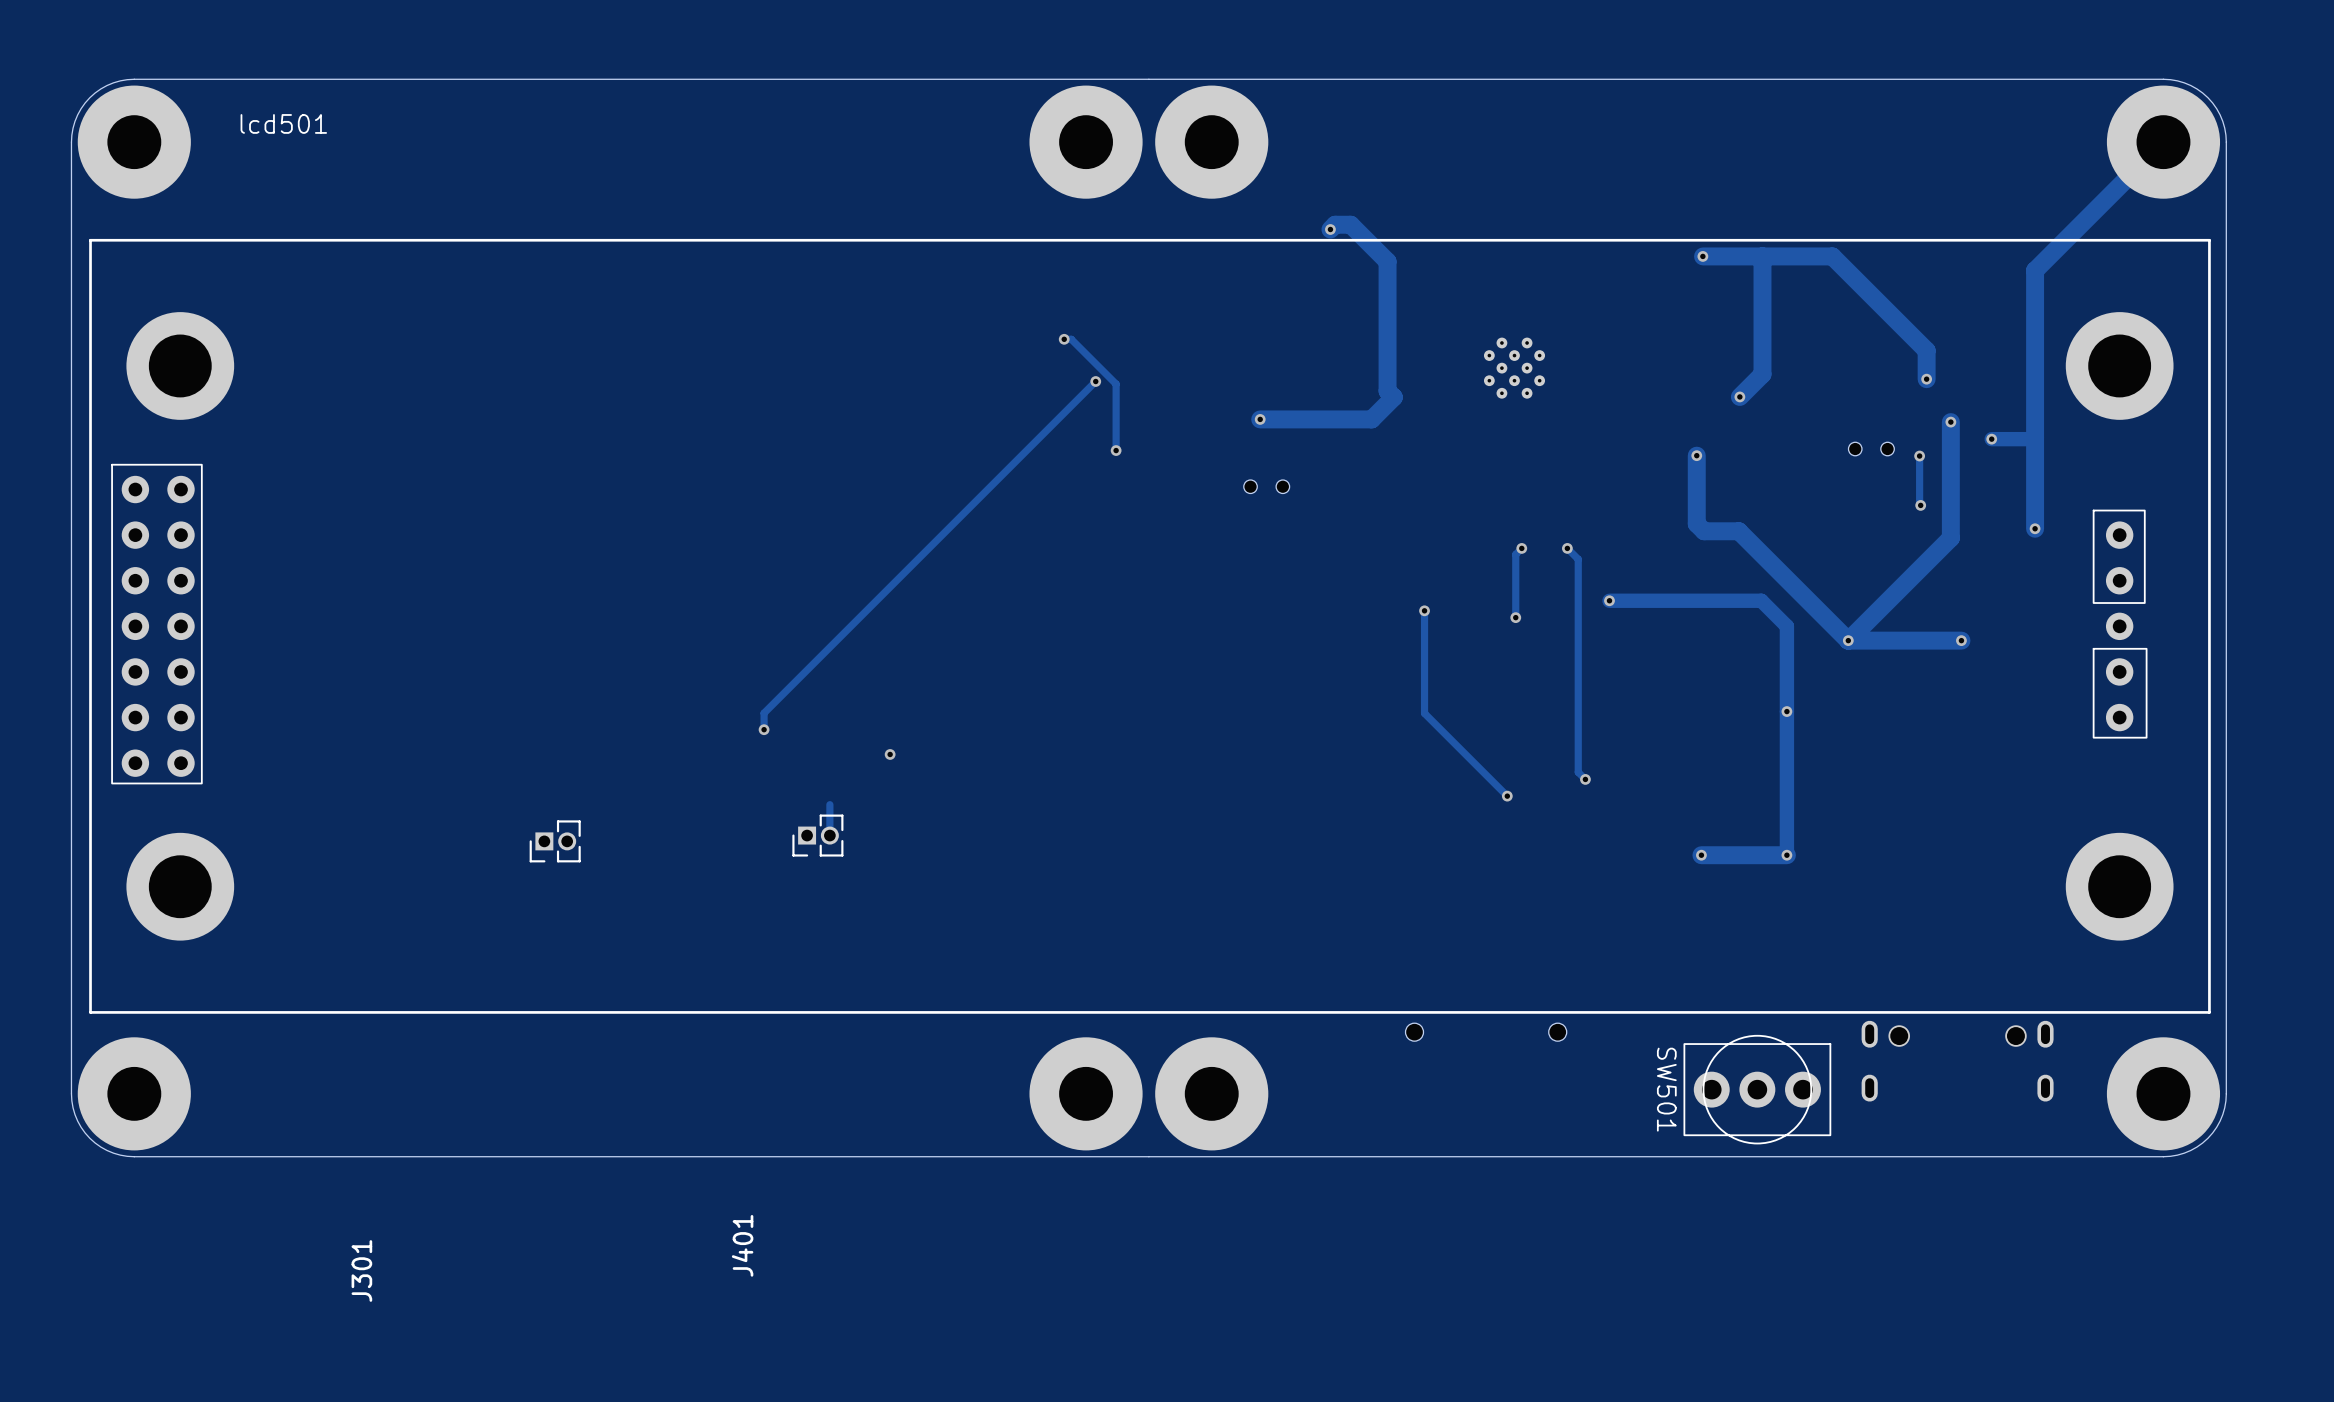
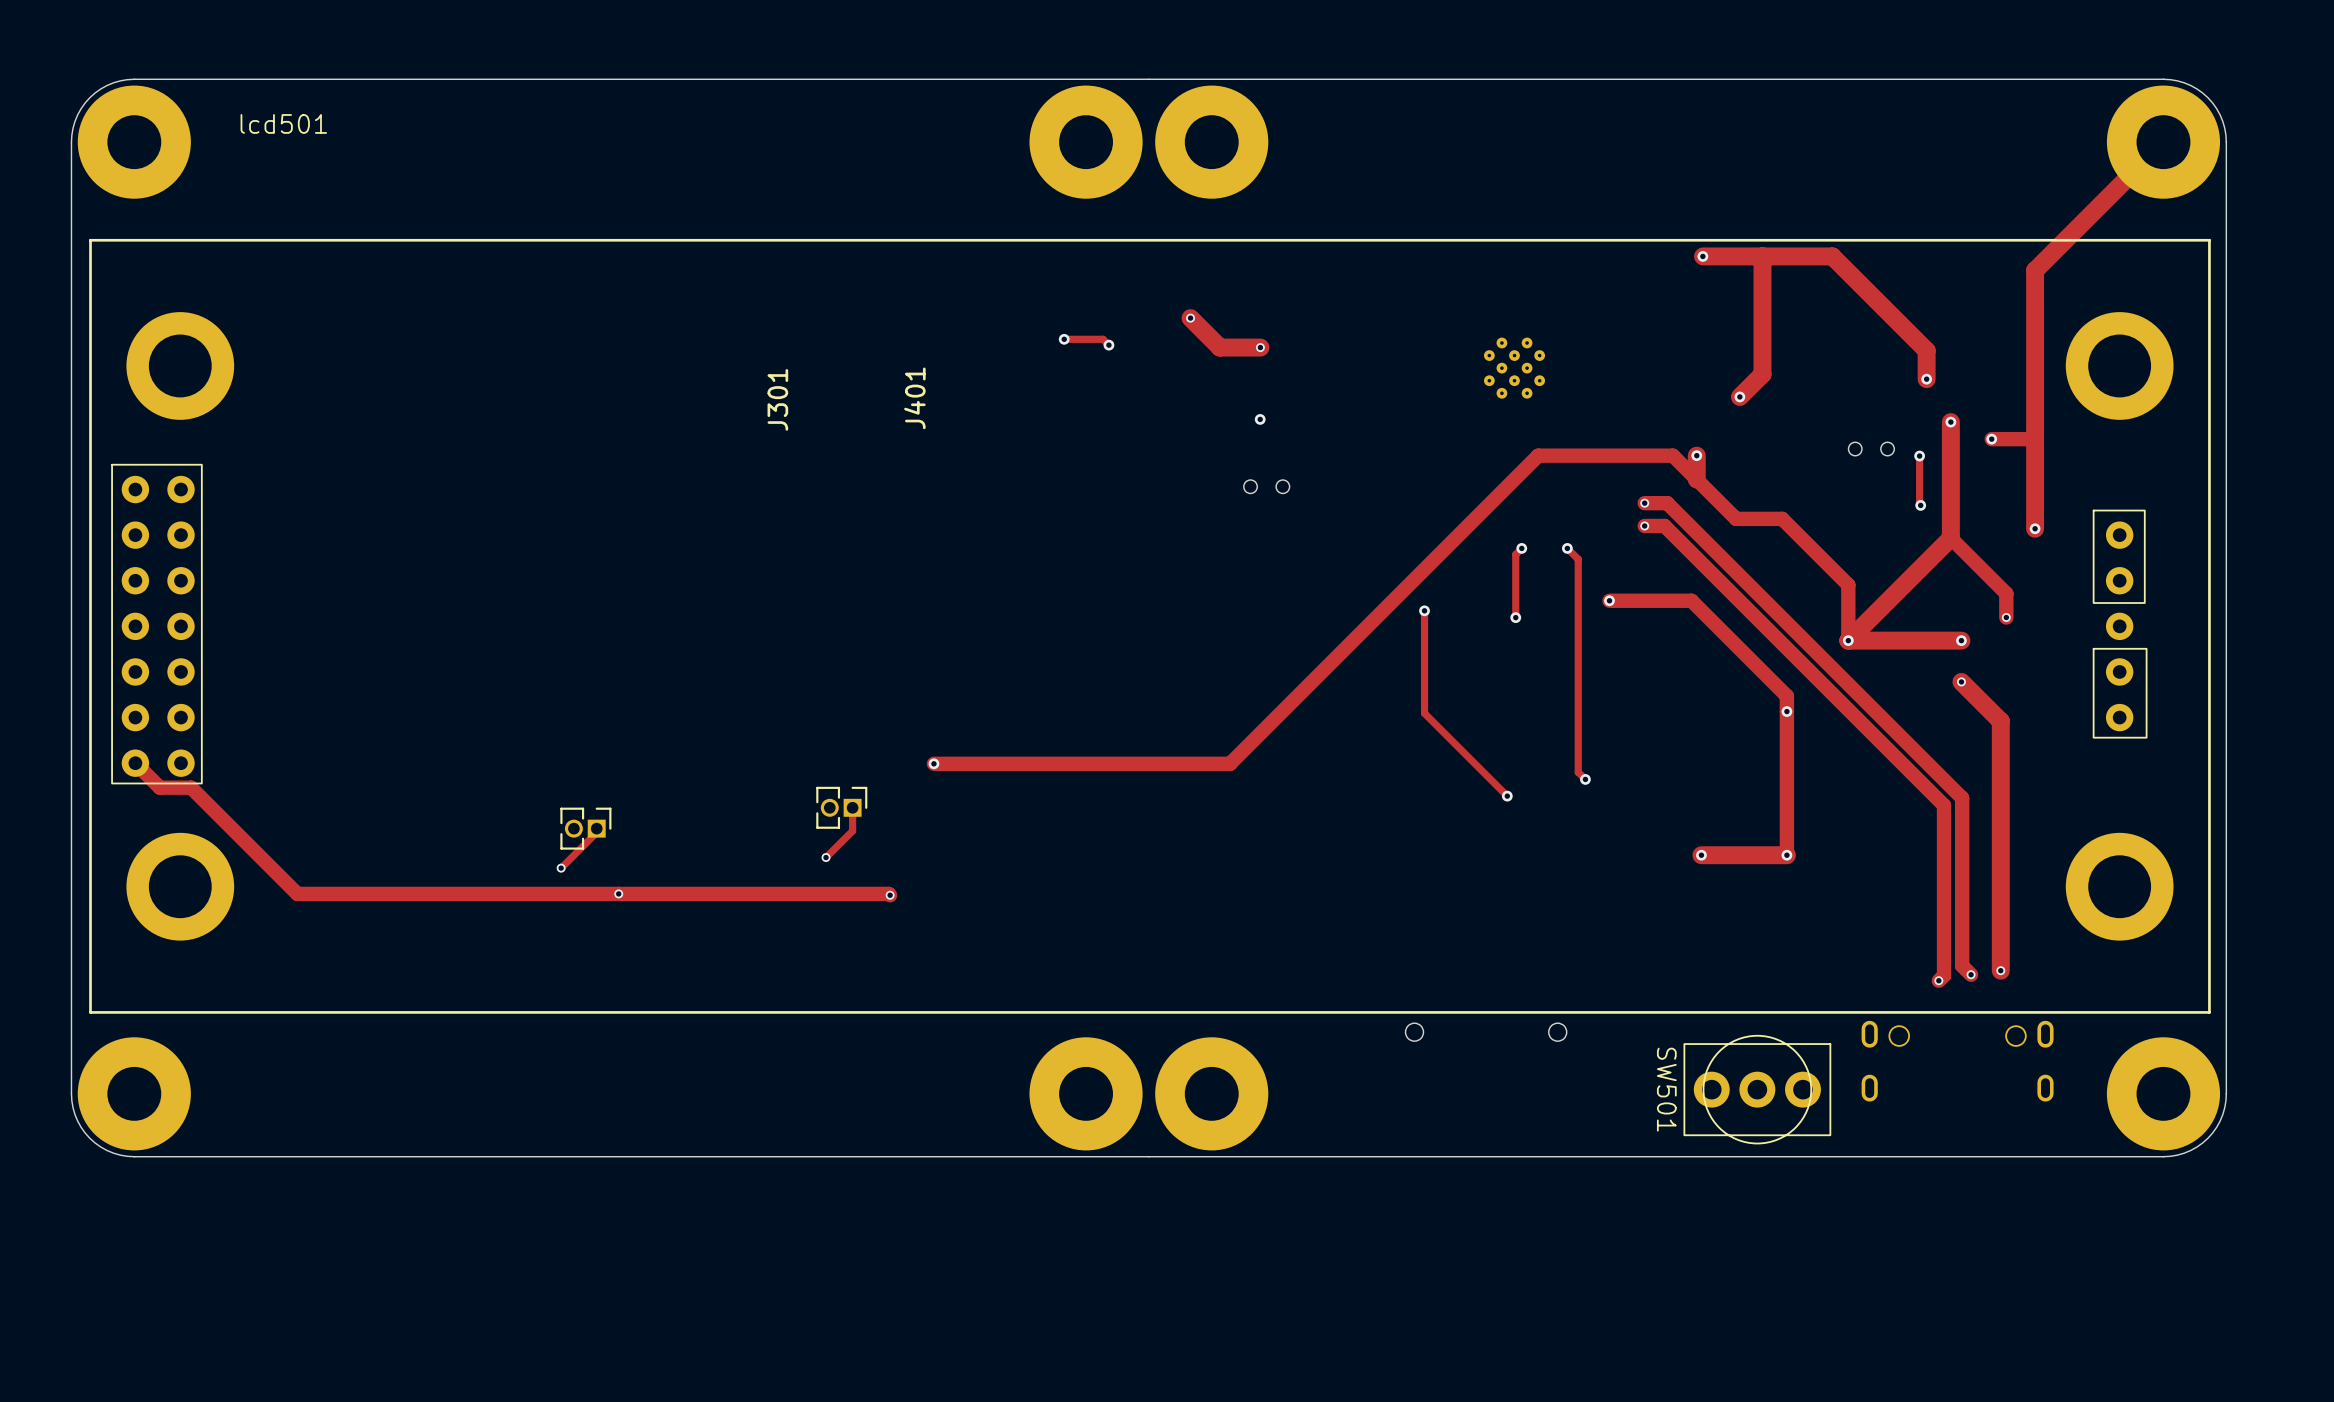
track: (1330, 229) (1335, 224) (1350, 224) (1387, 261) (1387, 391) (1393, 397) (1371, 419) (1260, 419) -> none
via: (1330, 229) -> none
track: none -> (1190, 318) (1220, 347) (1260, 347)
via: none -> (1190, 318)
track: (1071, 339) (1116, 384) (1116, 450) -> (1071, 339) (1103, 339) (1108, 345)
via: none -> (1260, 347)
track: (1095, 381) (764, 713) (764, 729) -> none
via position: (1095, 381) -> (1108, 345)
via: (1116, 450) -> none
track: (1696, 479) (1696, 523) (1704, 531) (1738, 531) (1848, 640) -> (933, 763) (1230, 763) (1538, 455) (1672, 455) (1736, 518) (1782, 518) (1848, 584) (1848, 640)
track: none -> (1644, 503) (1667, 503) (1962, 798) (1962, 965) (1971, 974)
via: none -> (1644, 503)
track: none -> (1644, 525) (1664, 525) (1944, 805) (1944, 975) (1938, 980)
via: none -> (1644, 525)
track: none -> (1950, 538) (2006, 593) (2006, 617)
track: (1691, 600) (1761, 600) (1786, 626) (1786, 696) -> (1691, 600) (1786, 696)
via: none -> (2006, 617)
track: none -> (1961, 681) (2000, 721) (2000, 970)
via: none -> (1961, 681)
via: (764, 729) -> none
via position: (890, 754) -> (933, 763)
track: none -> (135, 763) (159, 787) (191, 787) (297, 893) (890, 895)
track: (829, 804) (829, 835) -> none
track: none -> (852, 807) (852, 830) (826, 857)
track: none -> (596, 828) (596, 832) (561, 868)
J401 rotation: 0° (817, 835) -> 180° (841, 807)
J401 position: (817, 835) -> (841, 807)
J301 rotation: 0° (555, 841) -> 180° (585, 828)
J301 position: (555, 841) -> (585, 828)
via: none -> (826, 857)
via: none -> (561, 868)
via: none -> (618, 893)
via: none -> (890, 895)
via: none -> (2000, 970)
via: none -> (1971, 974)
via: none -> (1938, 980)

